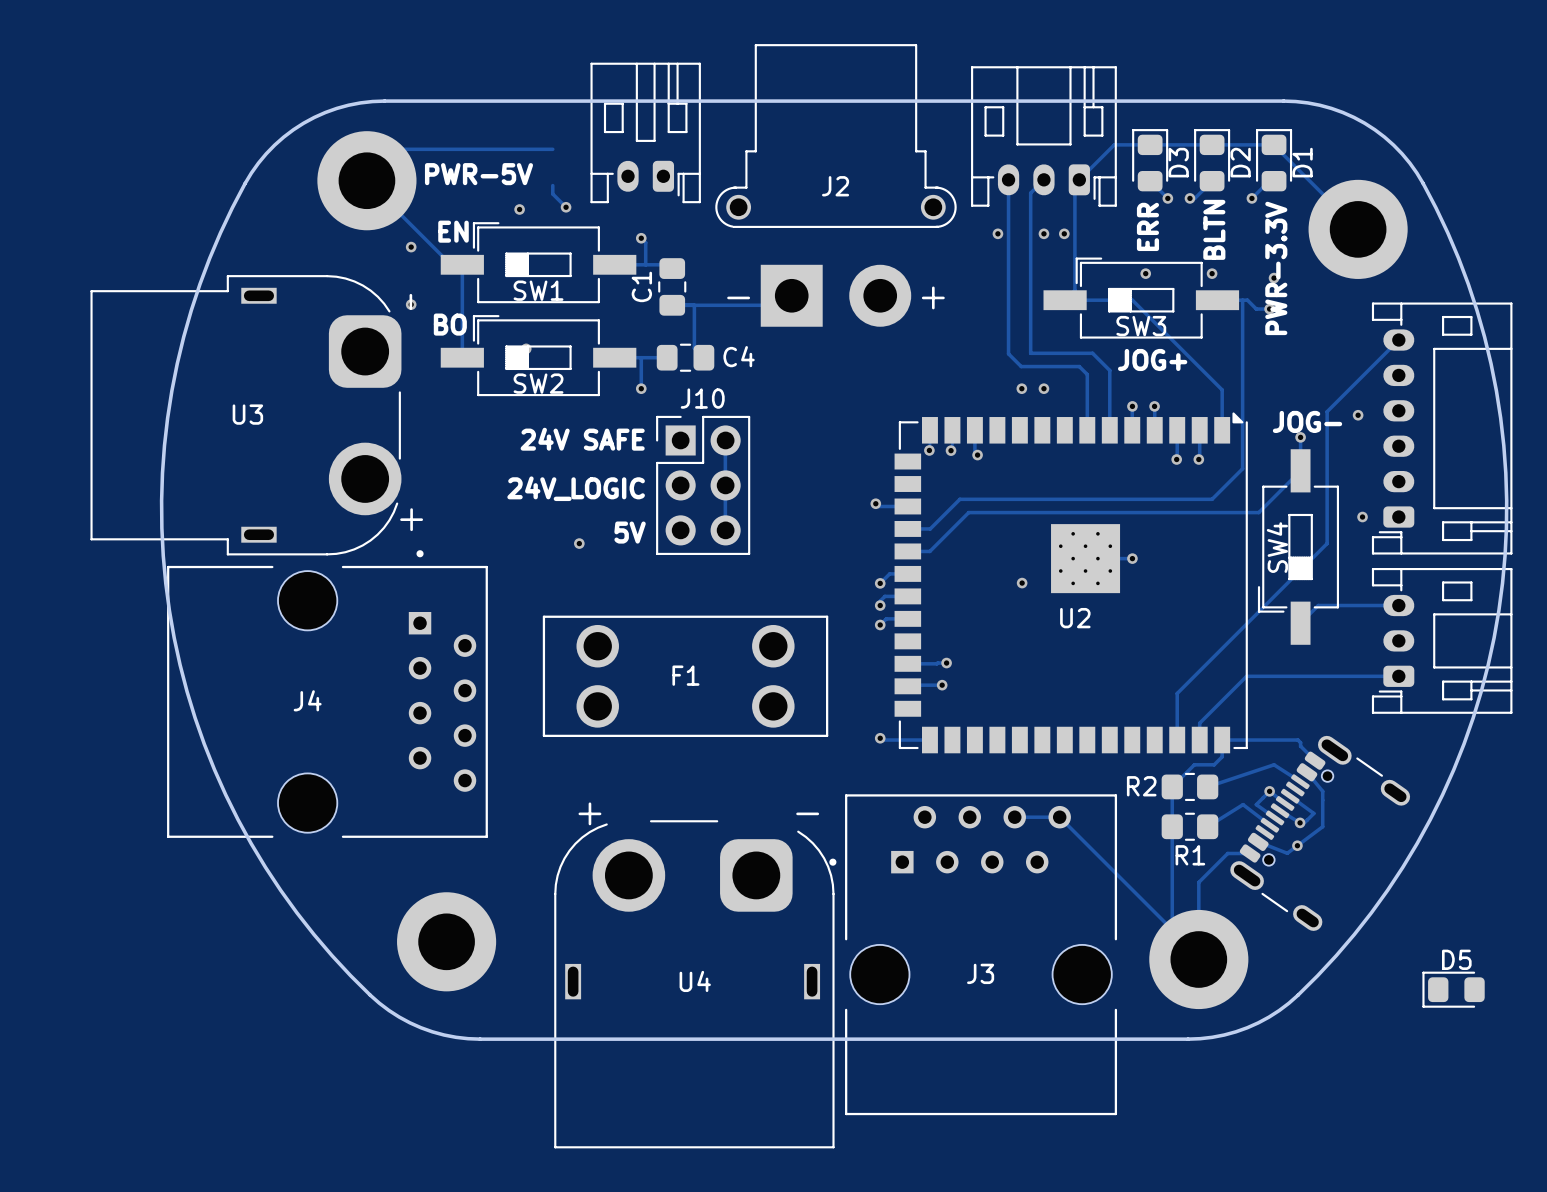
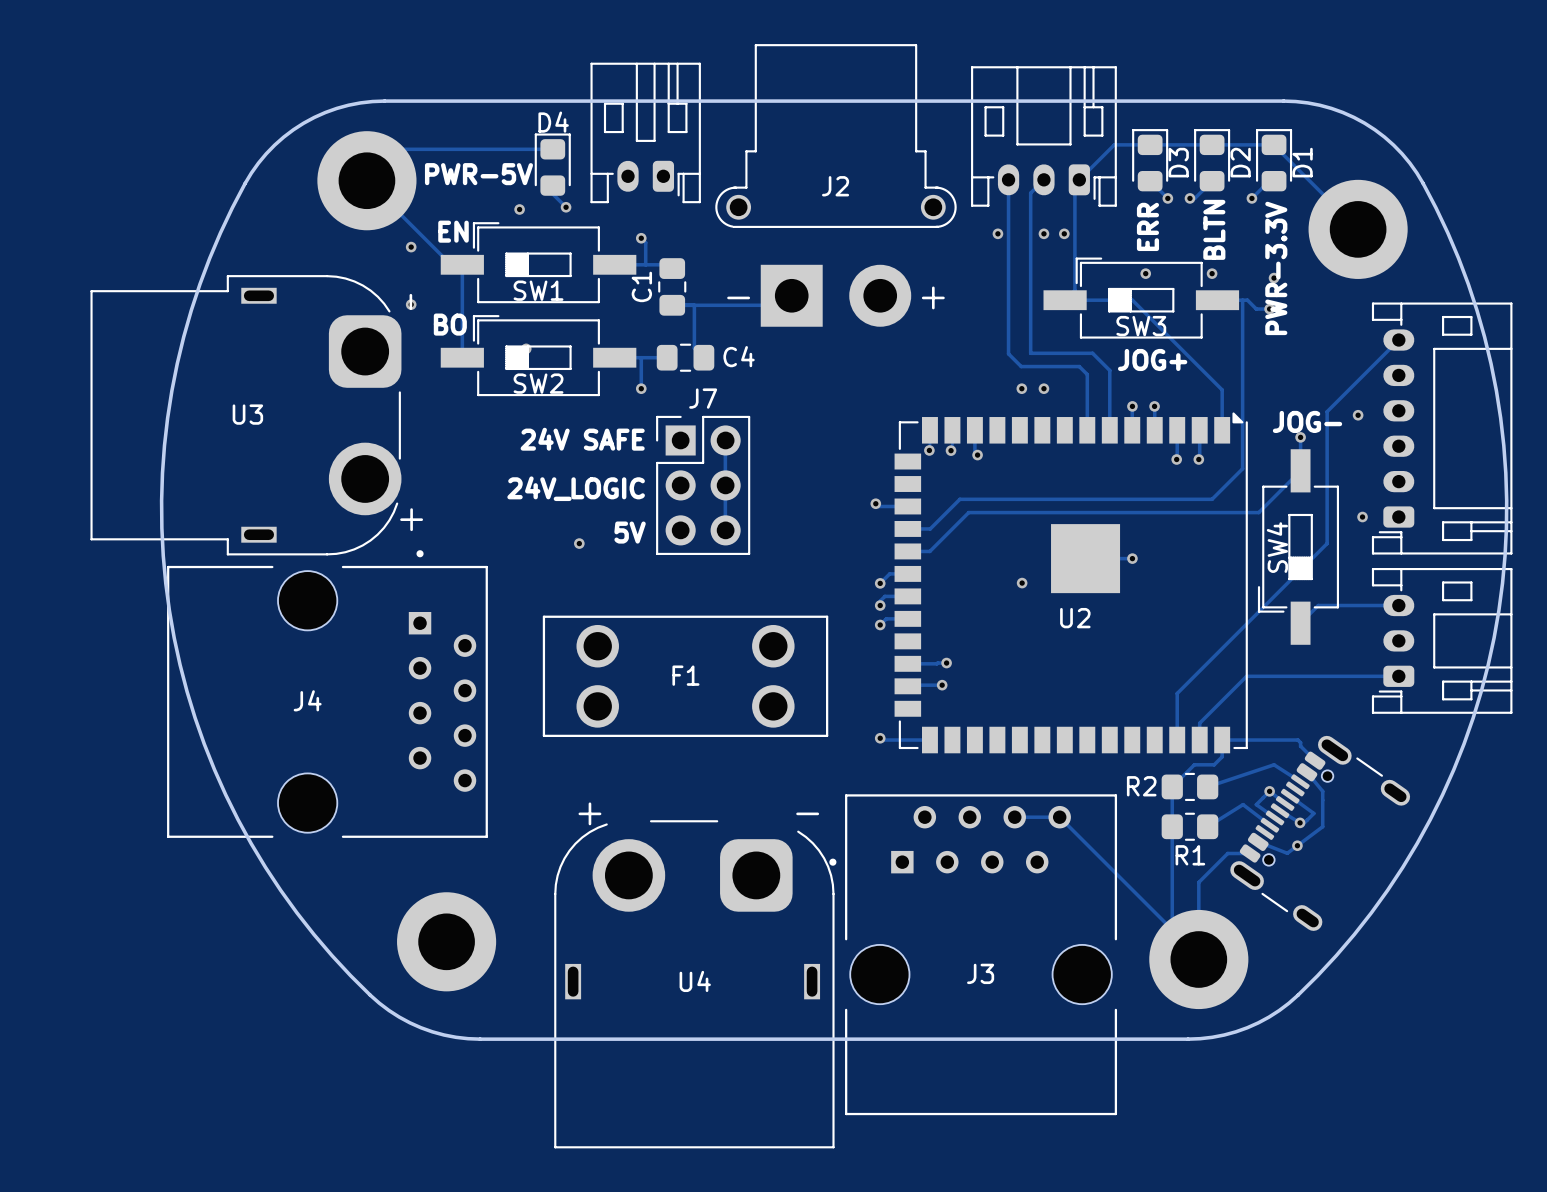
D4: none -> (552, 164)
J10 name: J10 (702, 398) -> J7 (703, 398)
U2 footprint: [894, 412, 1248, 754] -> [894, 412, 1248, 754]
D5: (1453, 989) -> none

